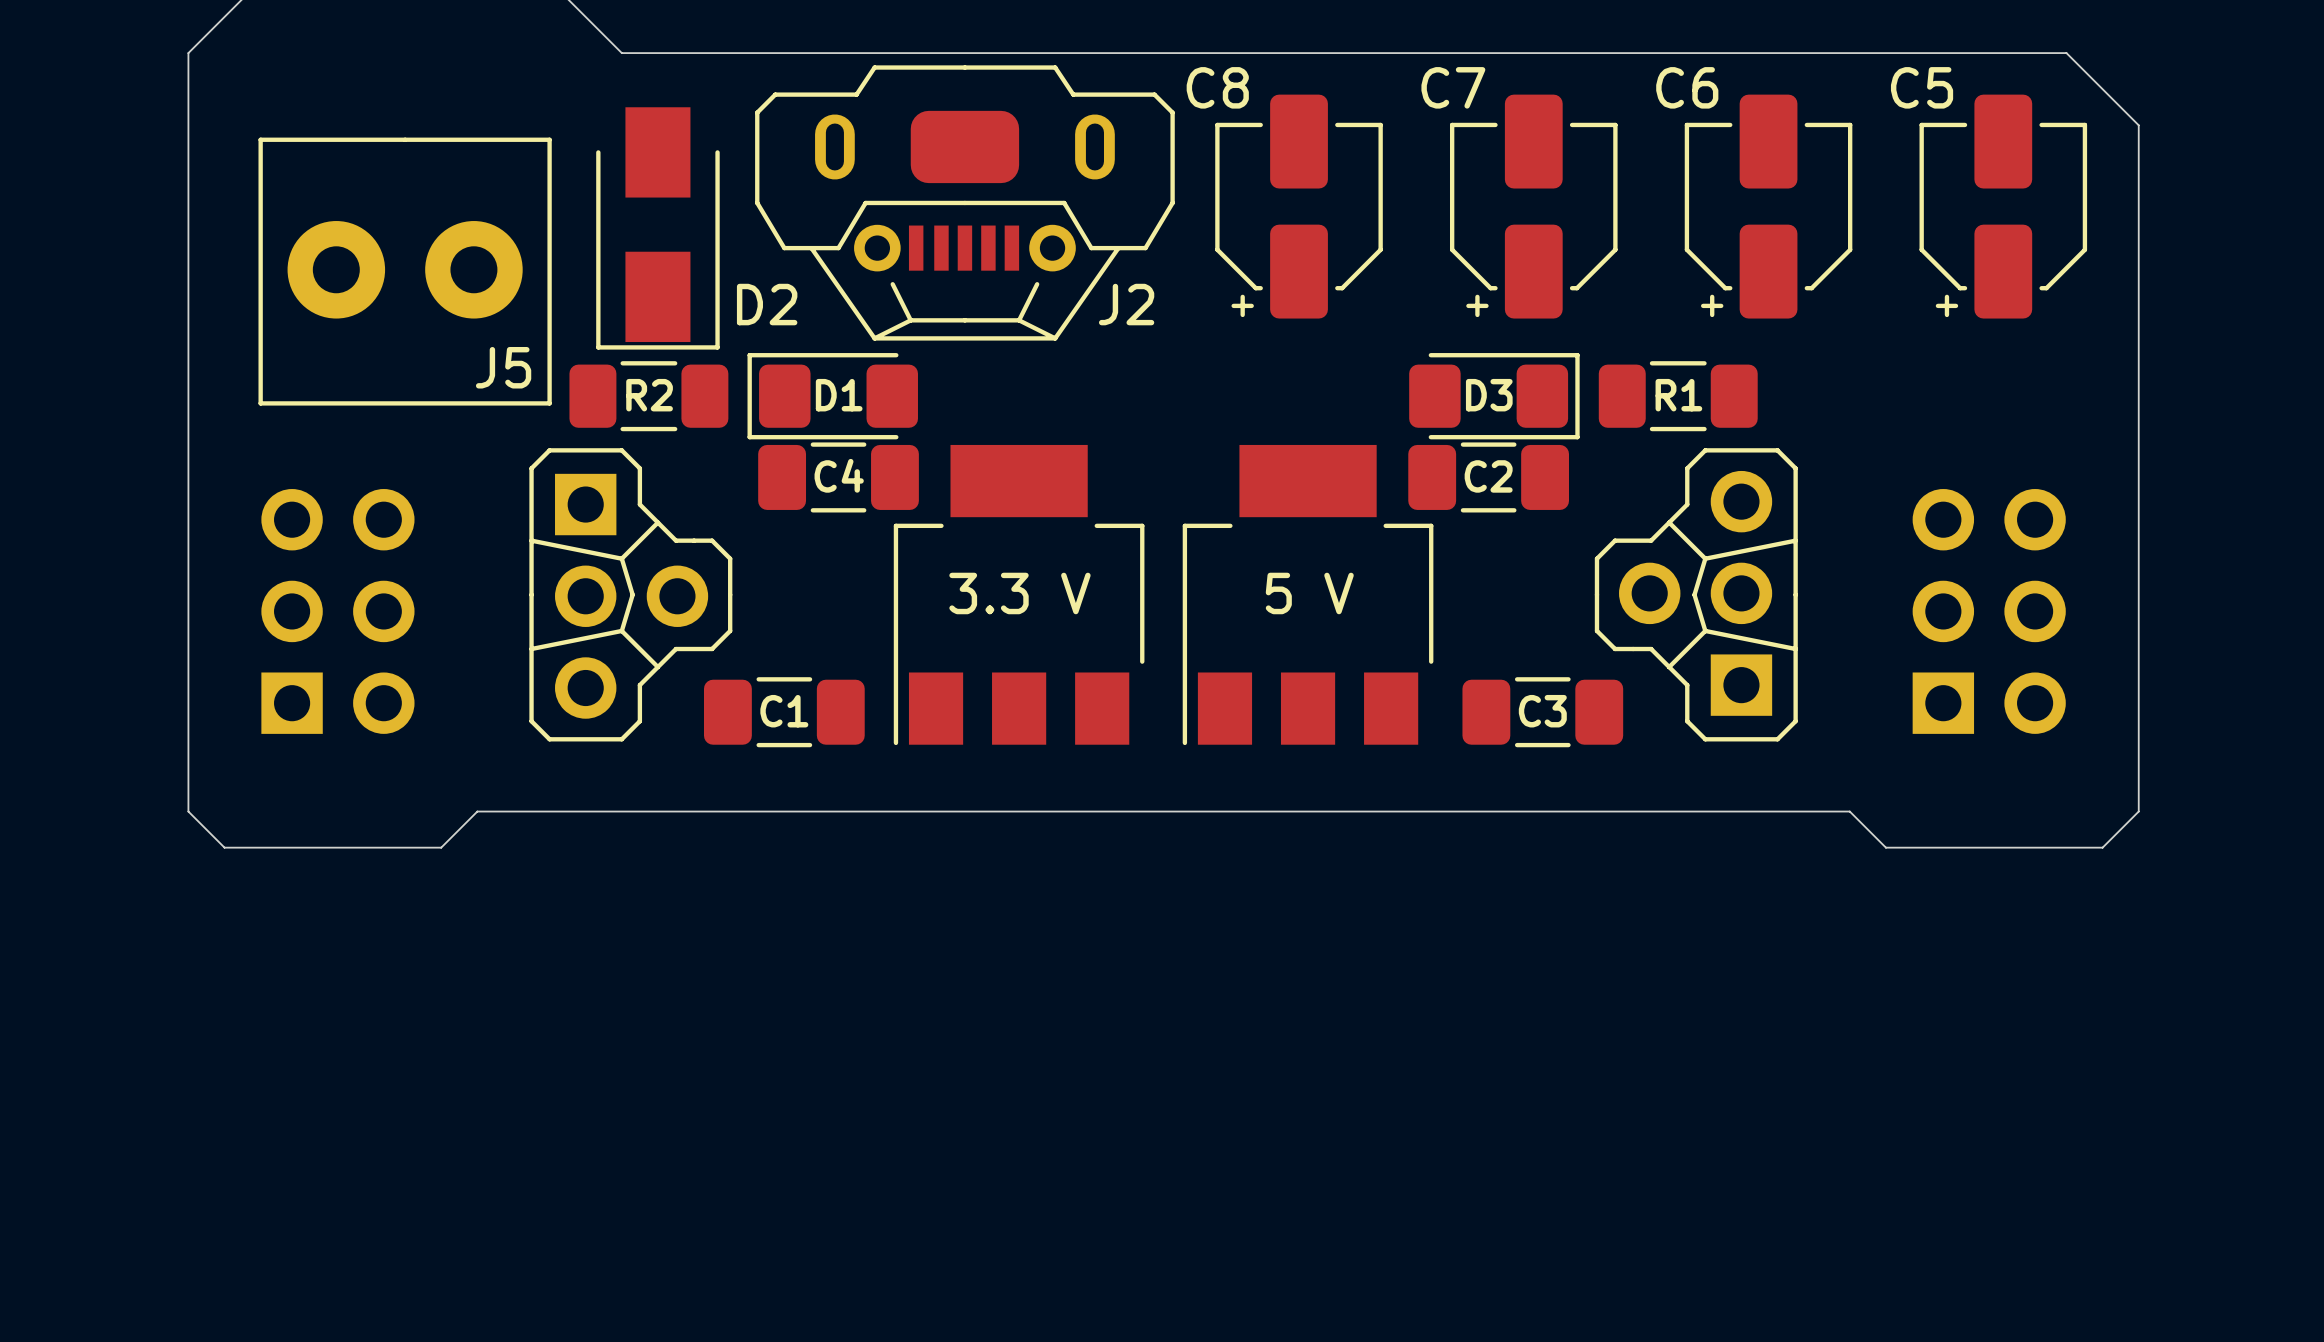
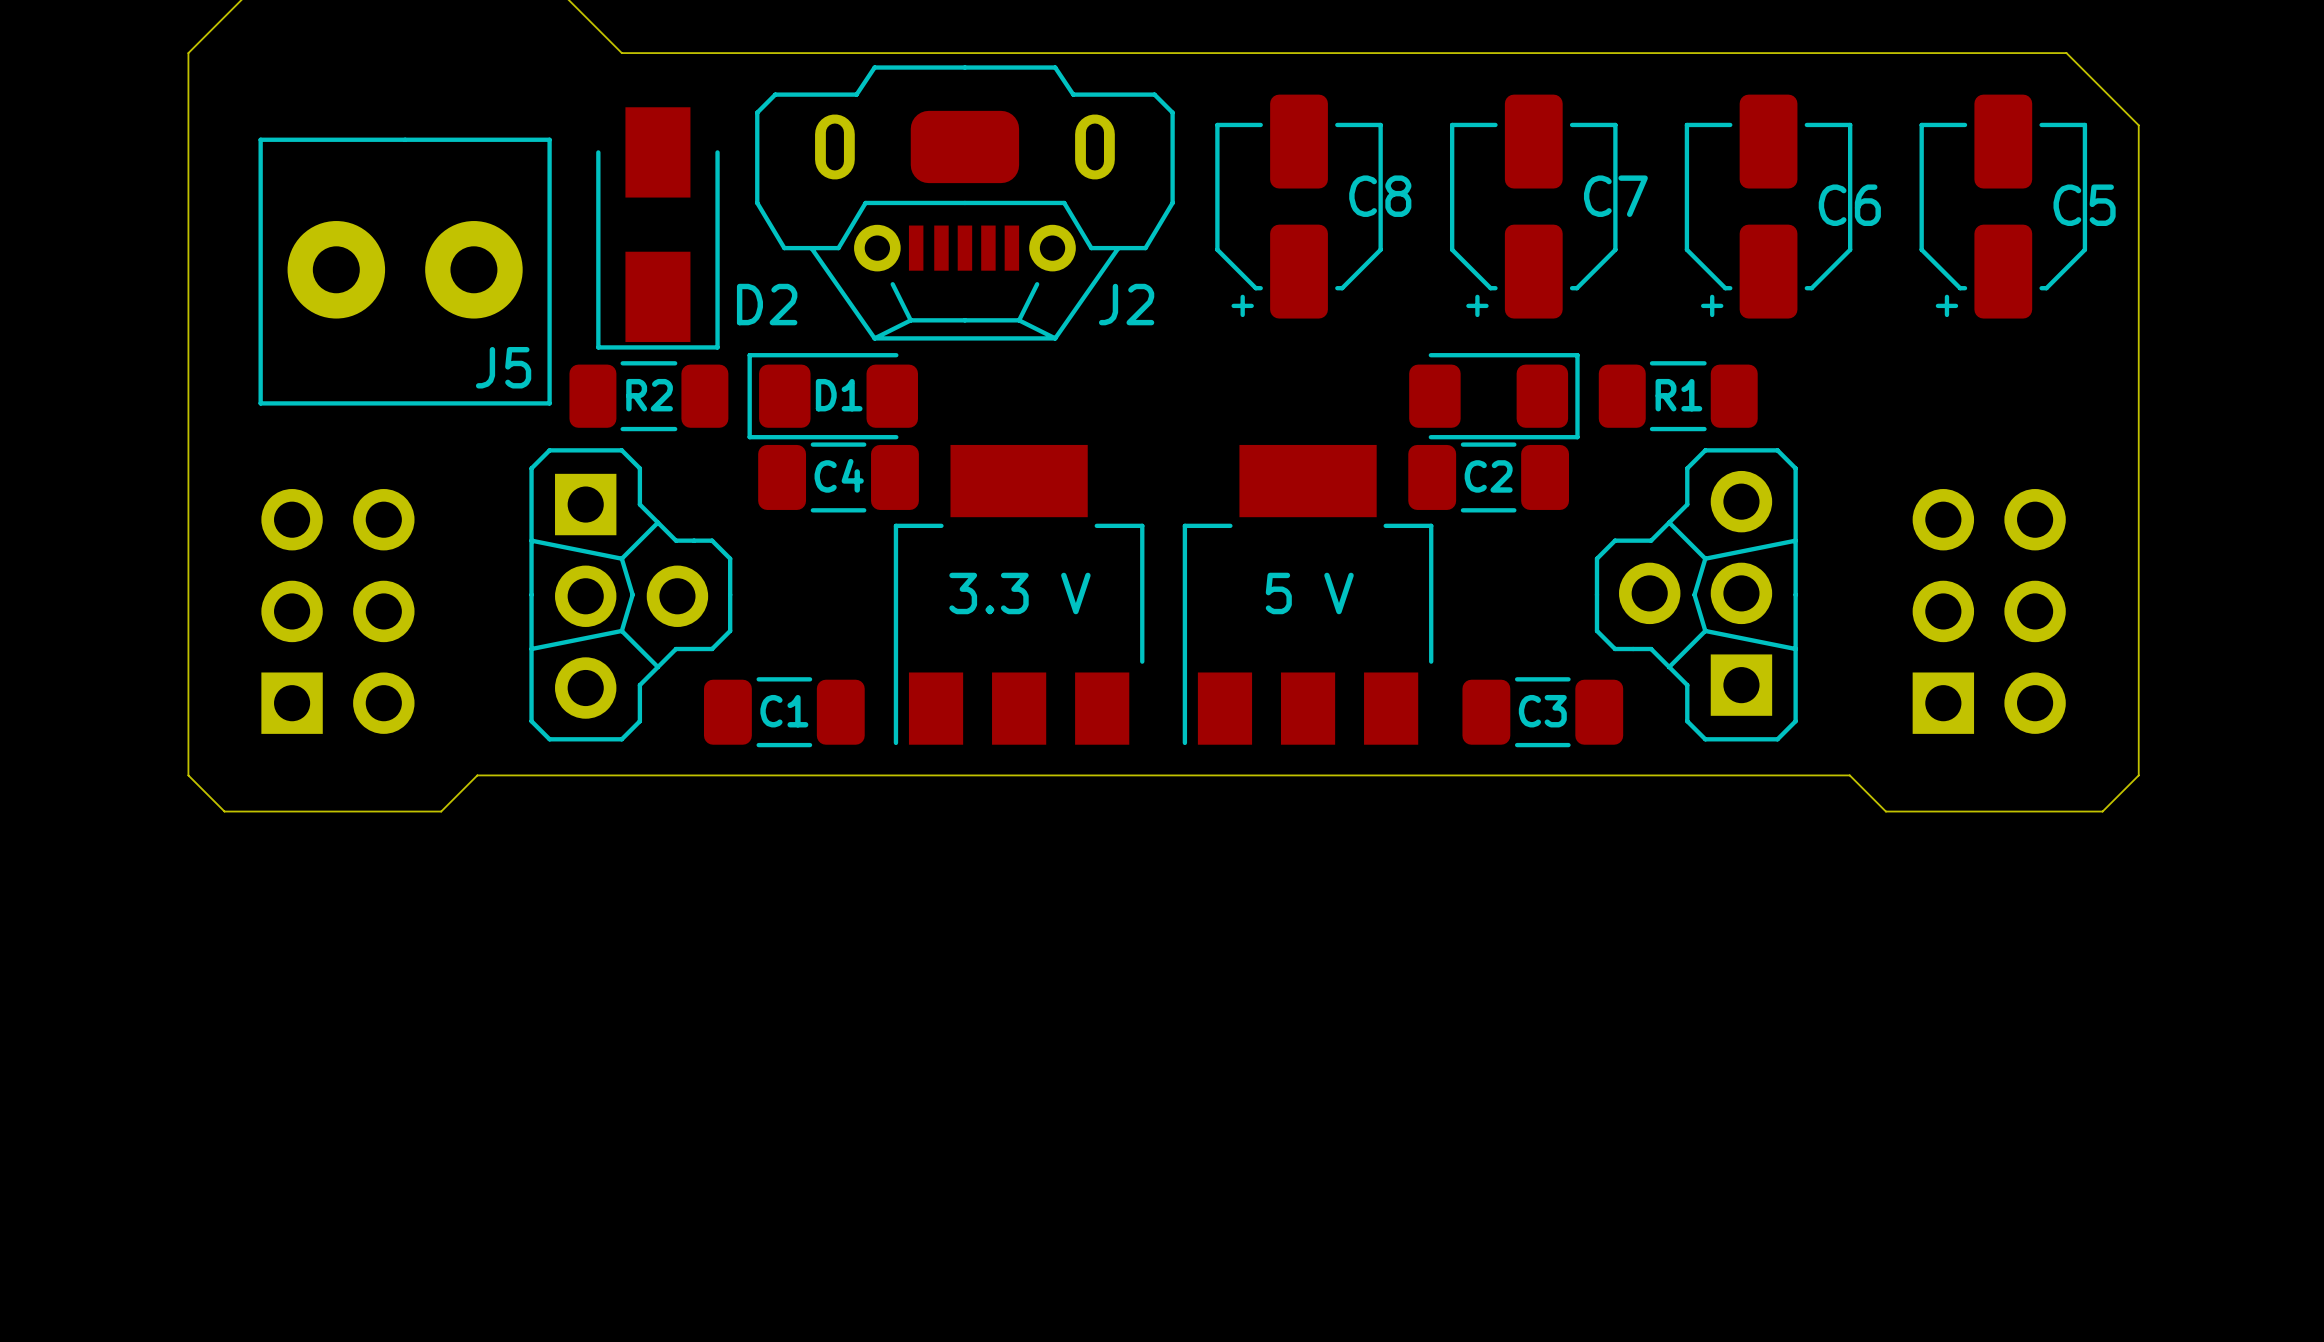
C8 name position: C8 (1217, 87) -> C8 (1380, 196)
C7 name position: C7 (1453, 87) -> C7 (1615, 196)
C6 name position: C6 (1687, 87) -> C6 (1849, 205)
C5 name position: C5 (1922, 87) -> C5 (2084, 205)
D3 name: D3 (1489, 395) -> none
board edge: (188, 775) (188, 811) (224, 847) (441, 847) (477, 811) (1849, 811) (1885, 847) (2102, 847) (2138, 811) (2138, 775) -> (188, 775) (224, 811) (441, 811) (477, 775) (1849, 775) (1885, 811) (2102, 811) (2138, 775)

